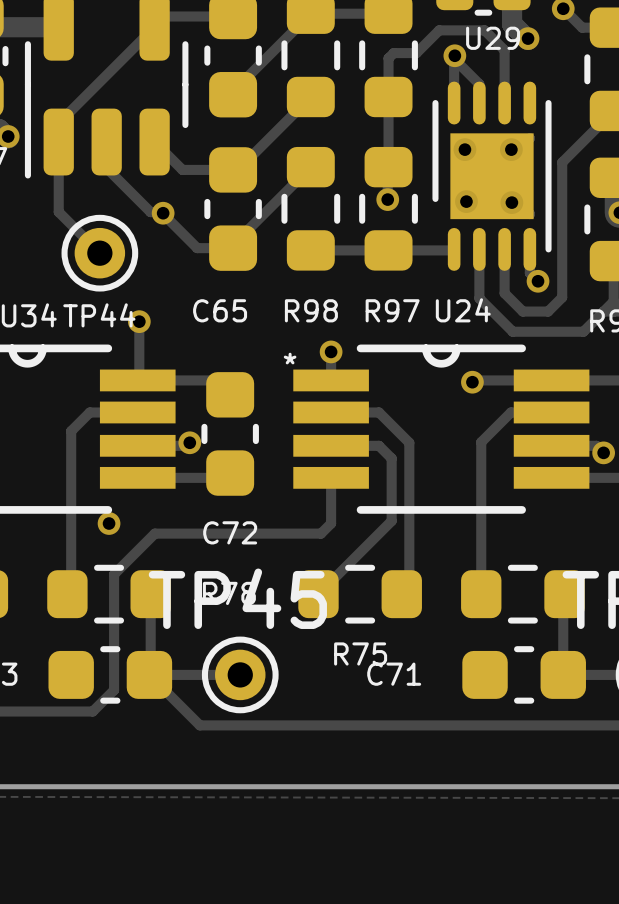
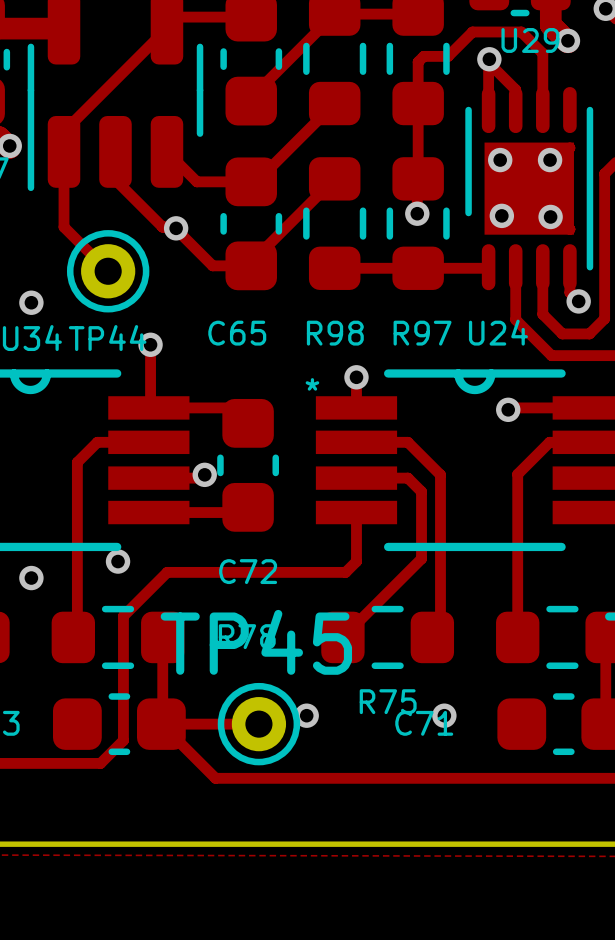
via: none -> (31, 302)
via: none -> (31, 578)
via: none -> (306, 715)
via: none -> (444, 715)

